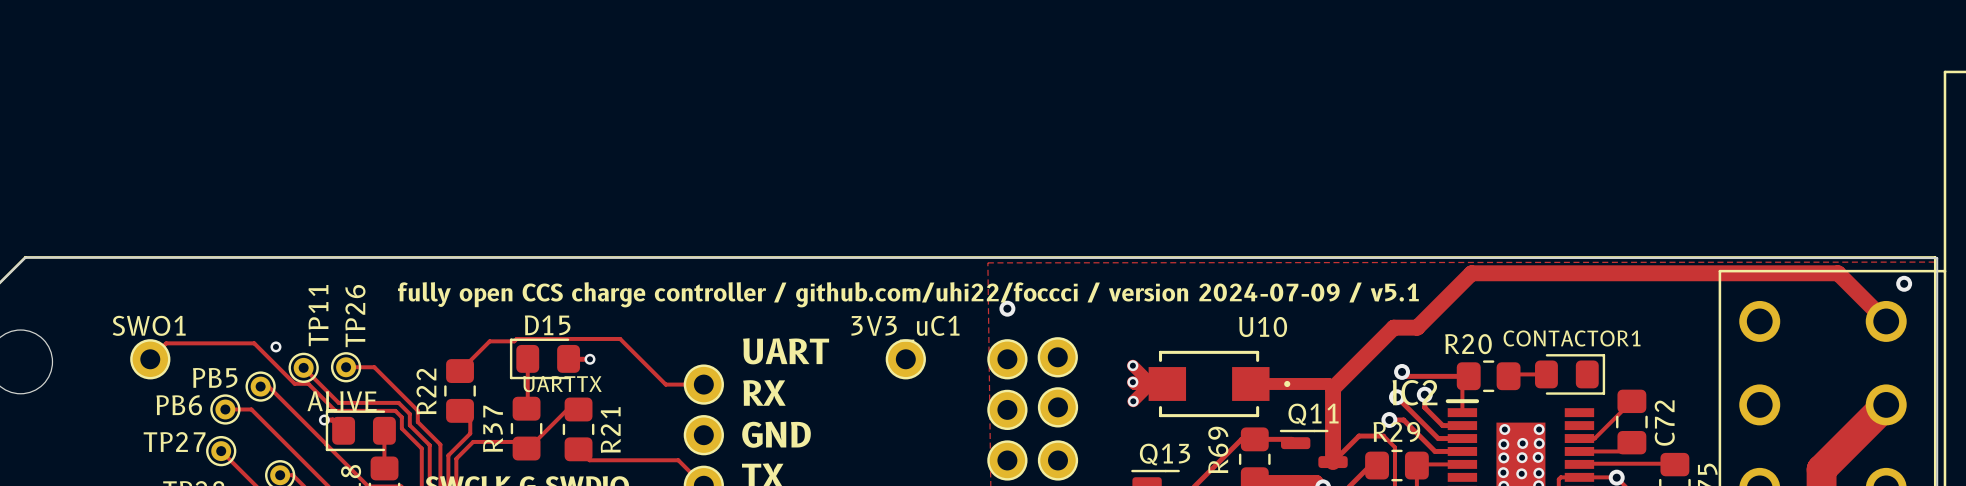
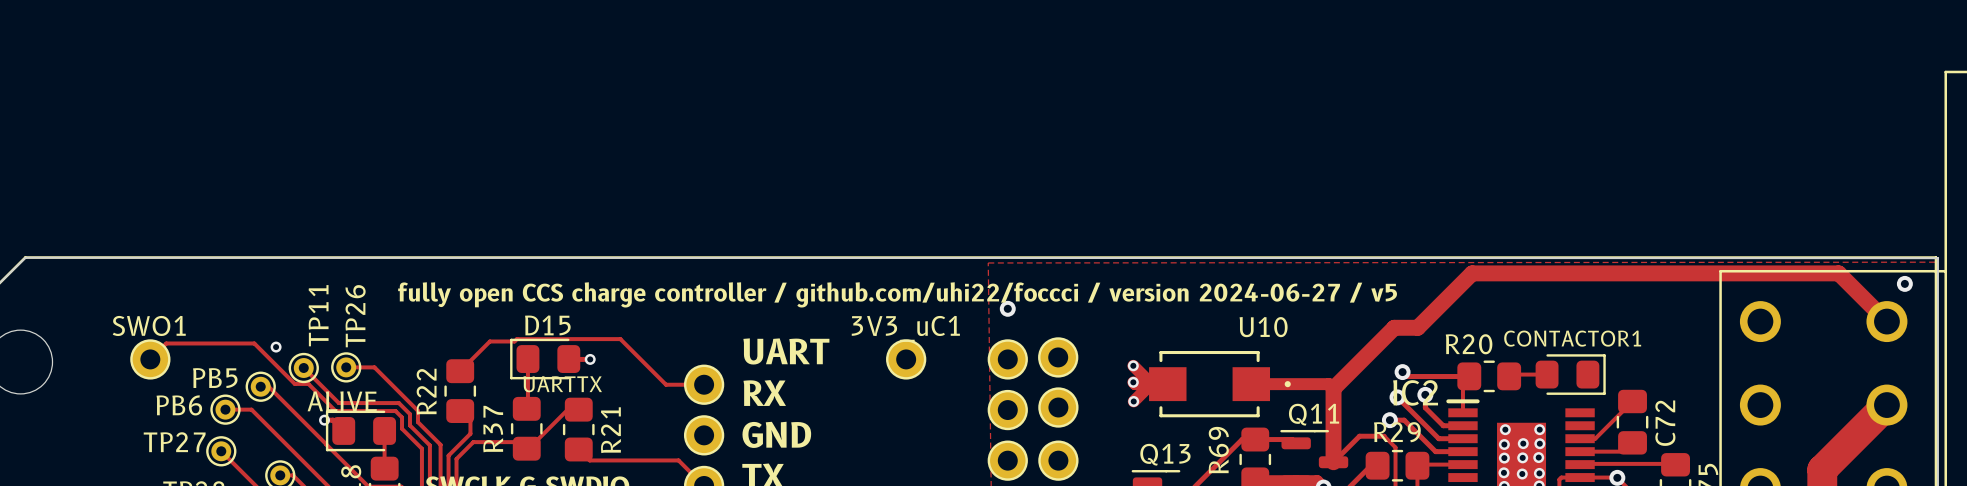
text: fully open CCS charge controller / github.com/uhi22/foccci / version 2024-07-09 / v5.1 (908, 294) -> fully open CCS charge controller / github.com/uhi22/foccci / version 2024-06-27 / v5 (897, 294)

